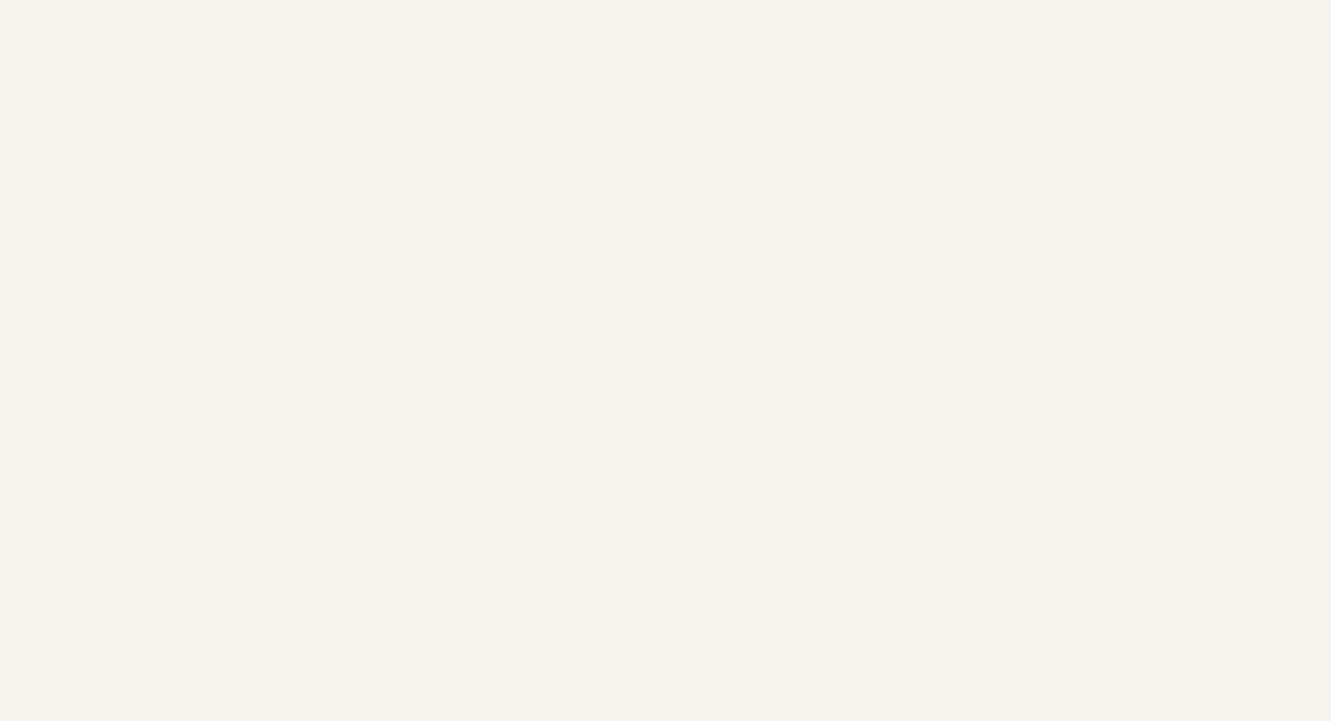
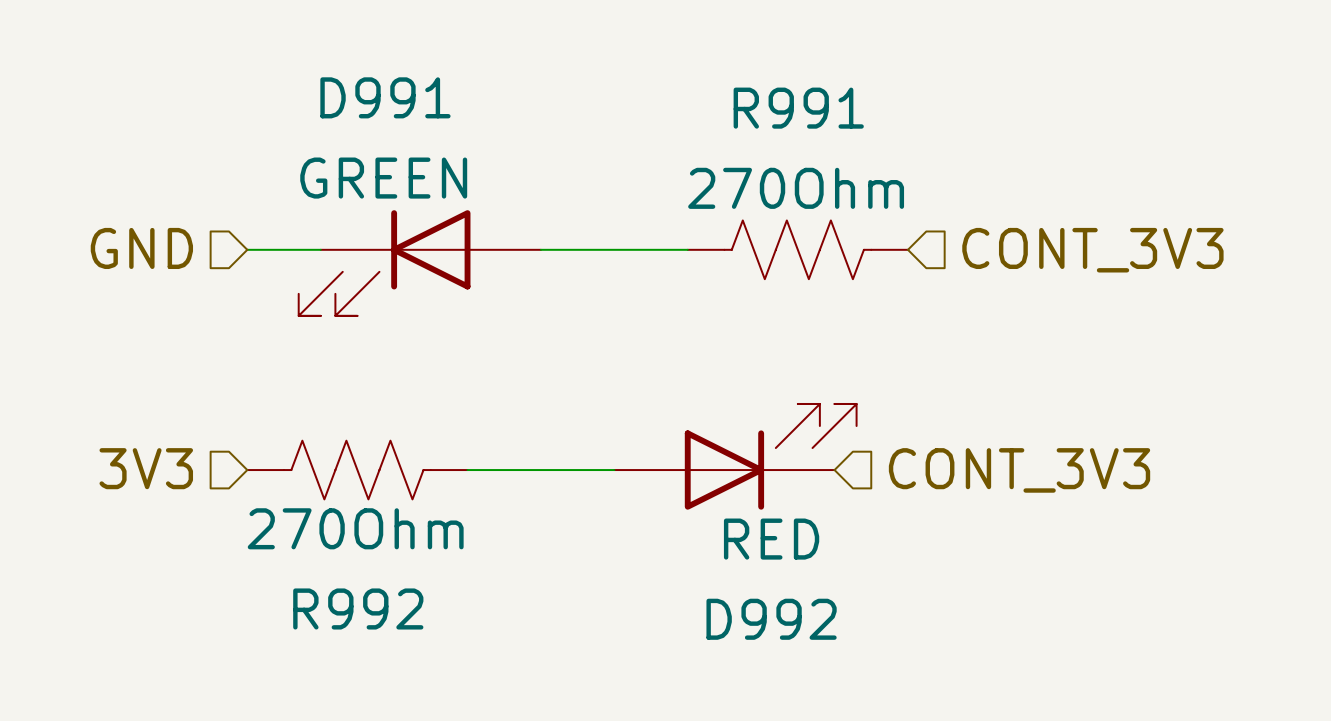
hierarchical label: none -> GND (141, 248)
wire: none -> (247, 249) (320, 249)
wire: none -> (540, 249) (687, 249)
R991: none -> 270Ohm (797, 249)
hierarchical label: none -> CONT_3V3 (1092, 250)
D991: none -> GREEN (419, 263)
D992: none -> RED (735, 456)
hierarchical label: none -> 3V3 (146, 468)
R992: none -> 270Ohm (357, 470)
wire: none -> (467, 470) (614, 470)
hierarchical label: none -> CONT_3V3 (1019, 470)

